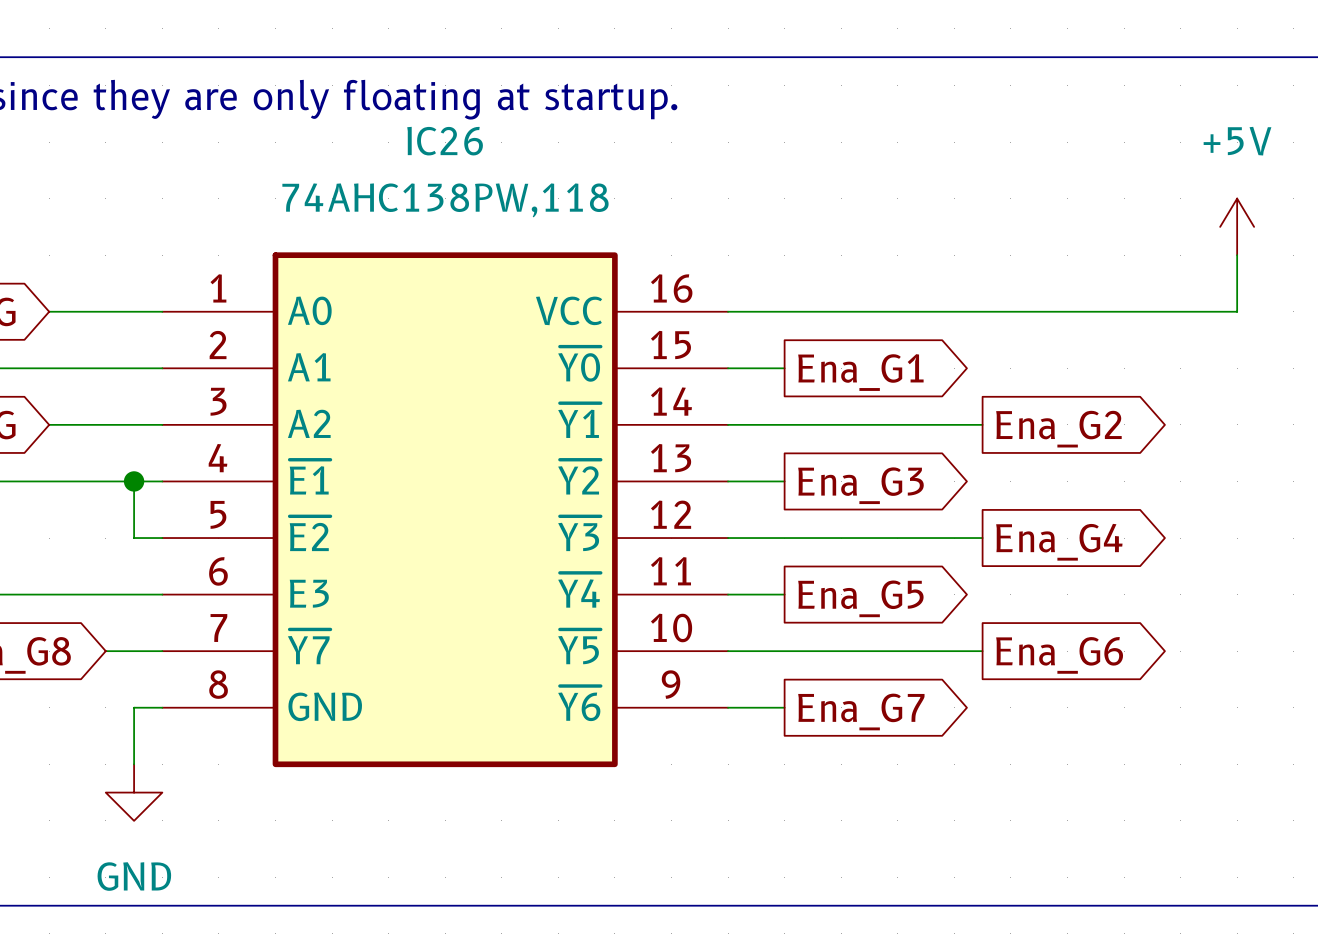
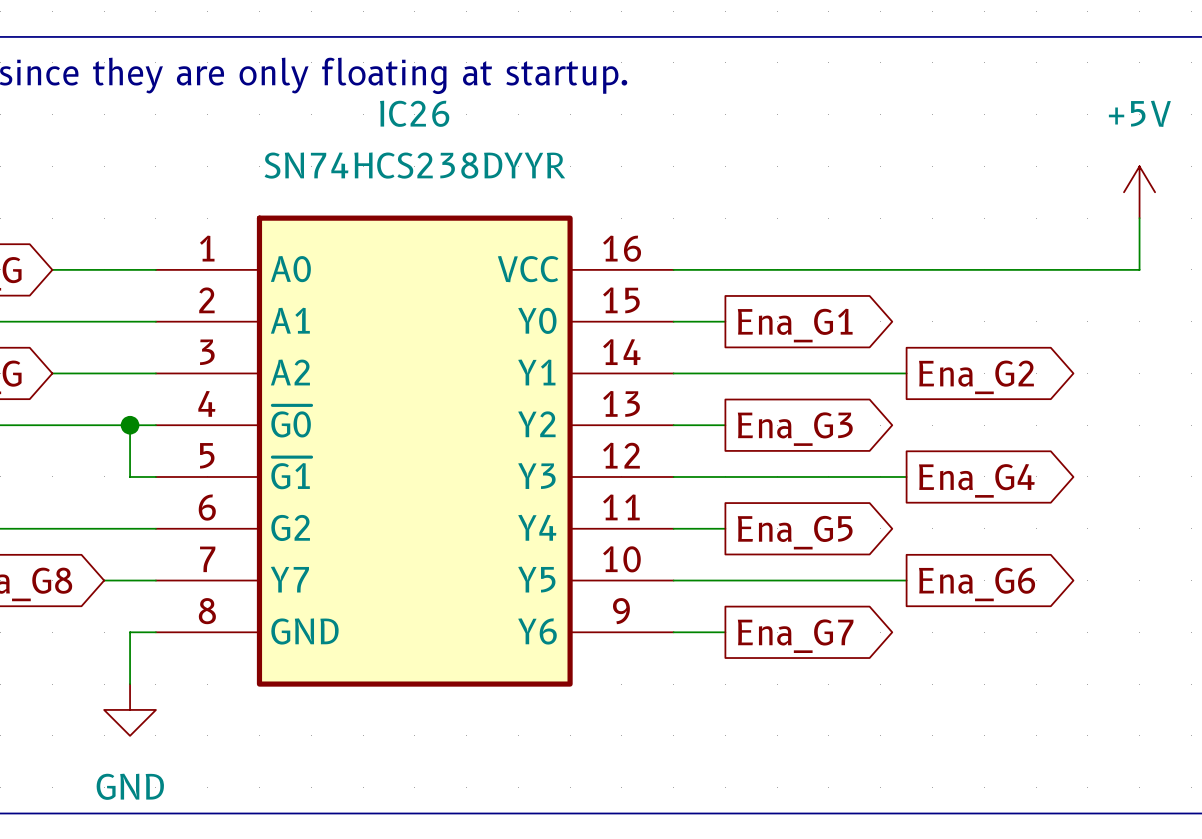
IC26 value: 74AHC138PW,118 (445, 200) -> SN74HCS238DYYR (414, 165)
IC26 symbol: [162, 252, 729, 768] -> [155, 215, 674, 687]

